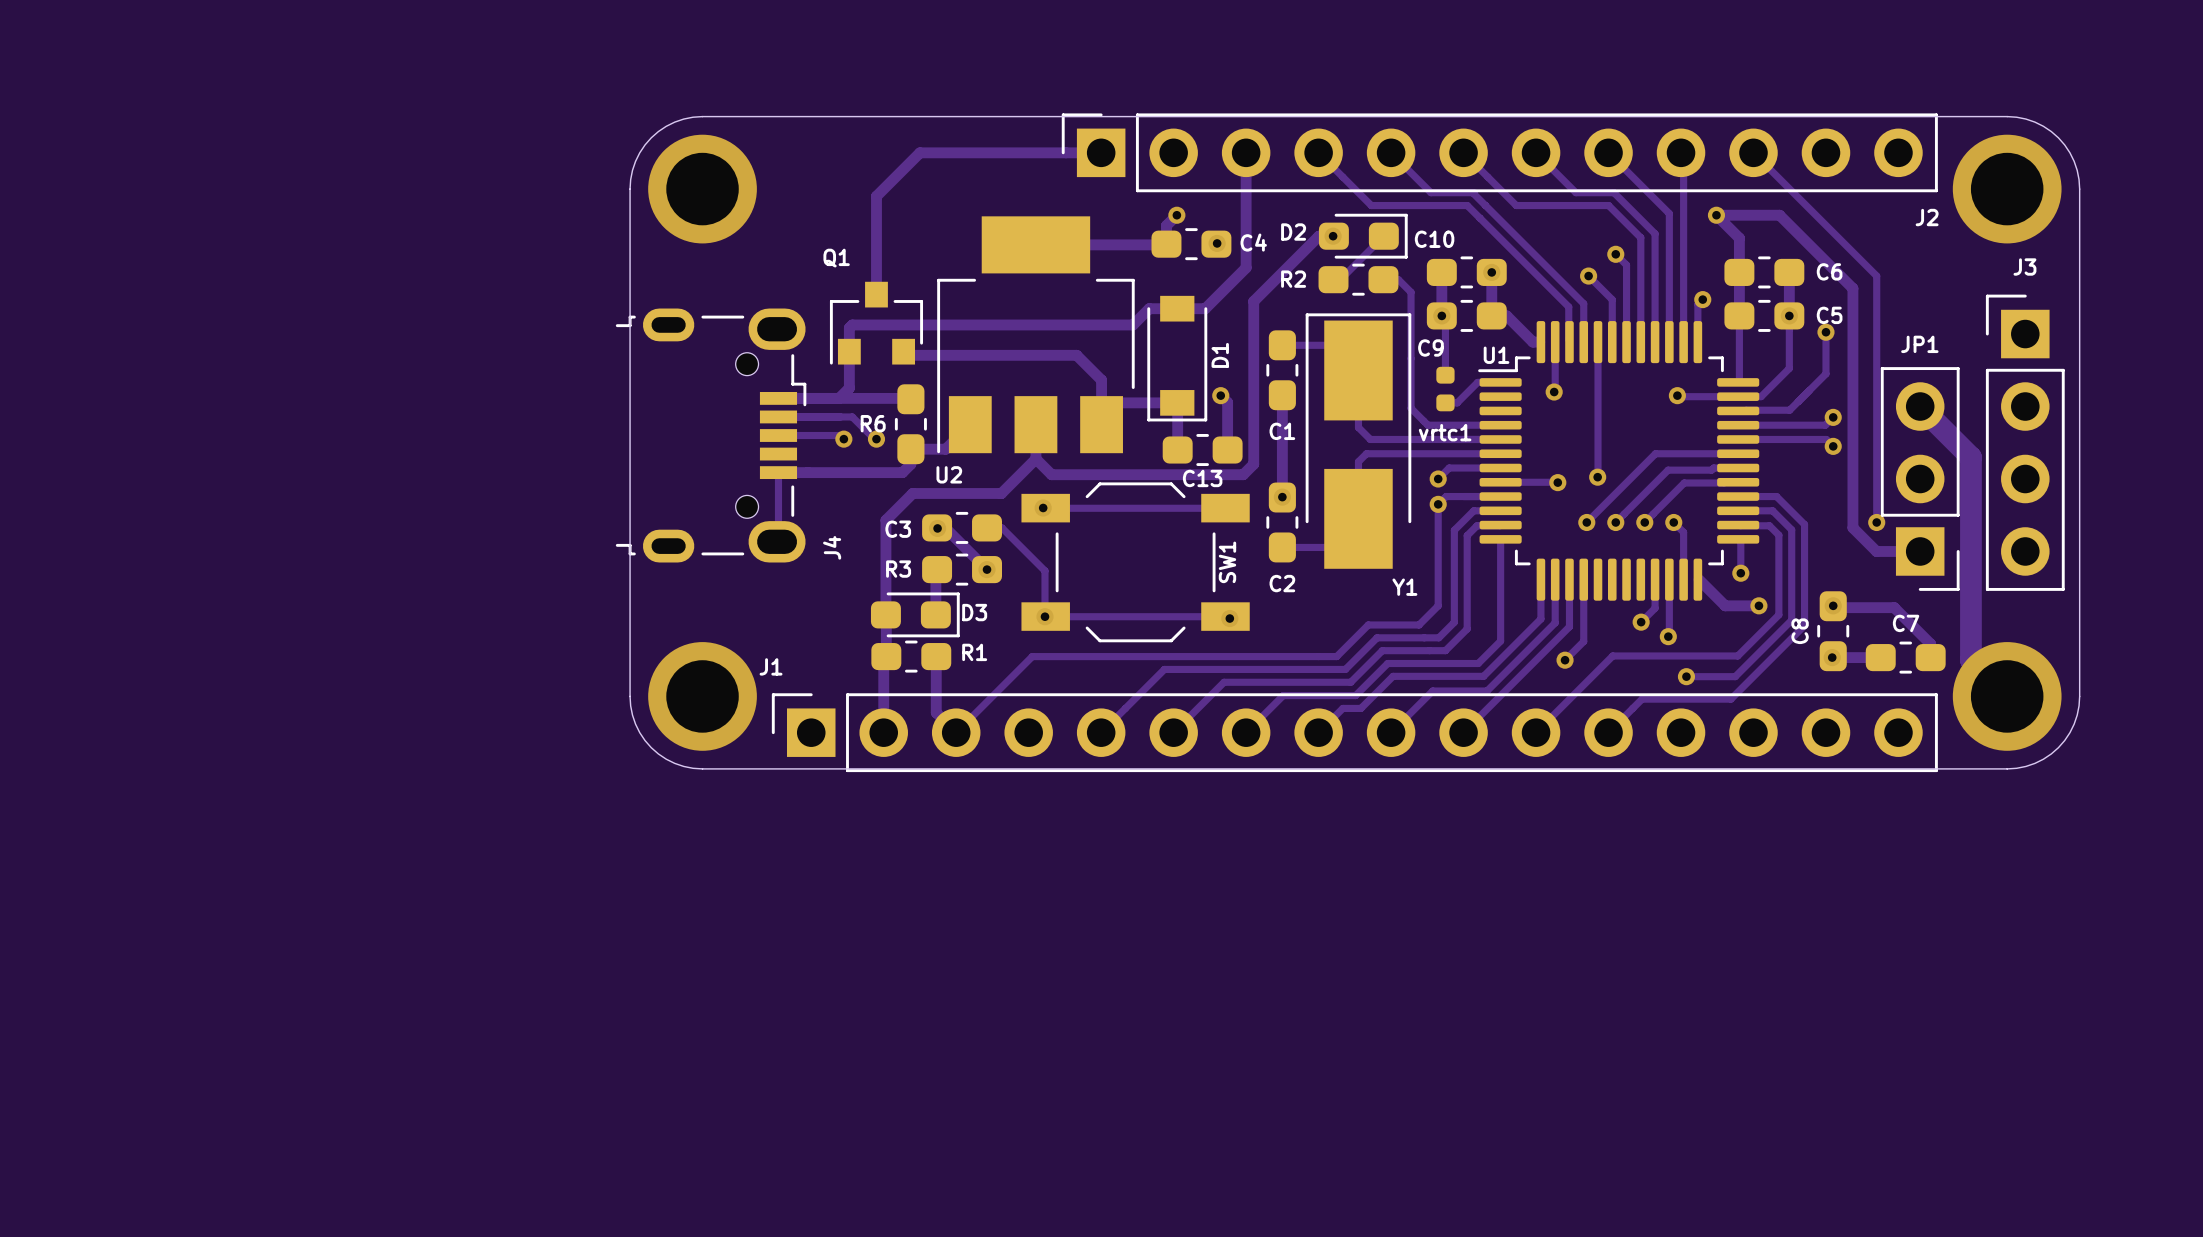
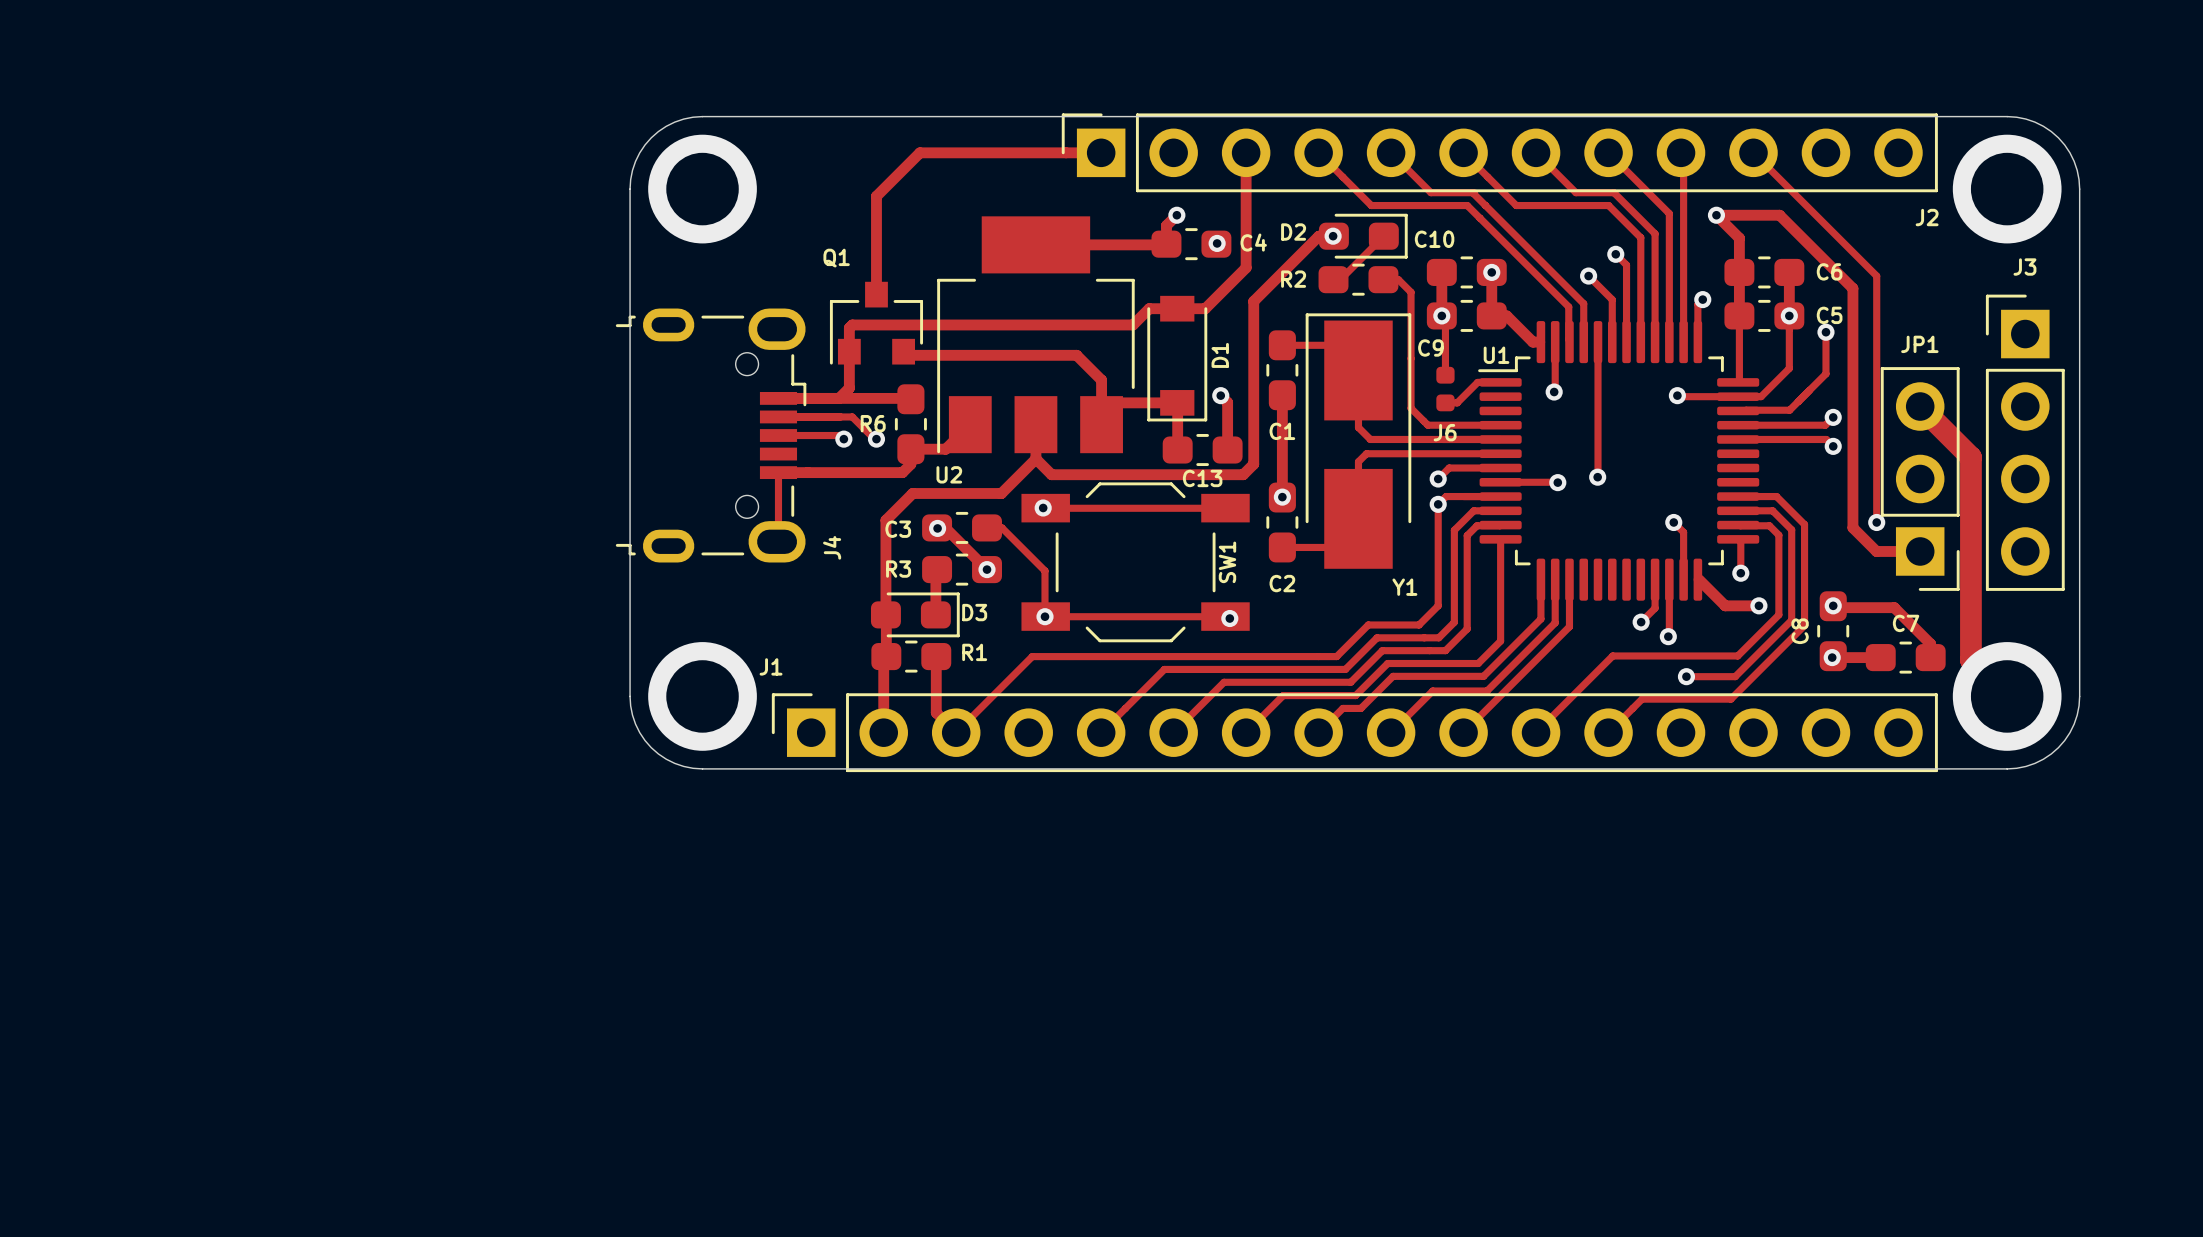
vrtc1 name: vrtc1 (1445, 432) -> J6 (1445, 432)
track: (1738, 453) (1655, 453) (1586, 522) -> none
track: (1738, 468) (1668, 470) (1615, 522) -> none
track: (1738, 482) (1684, 482) (1644, 522) -> none
via: (1586, 522) -> none
via: (1615, 522) -> none
via: (1644, 522) -> none
track: (1583, 579) (1583, 641) (1565, 660) -> none
via: (1565, 660) -> none

